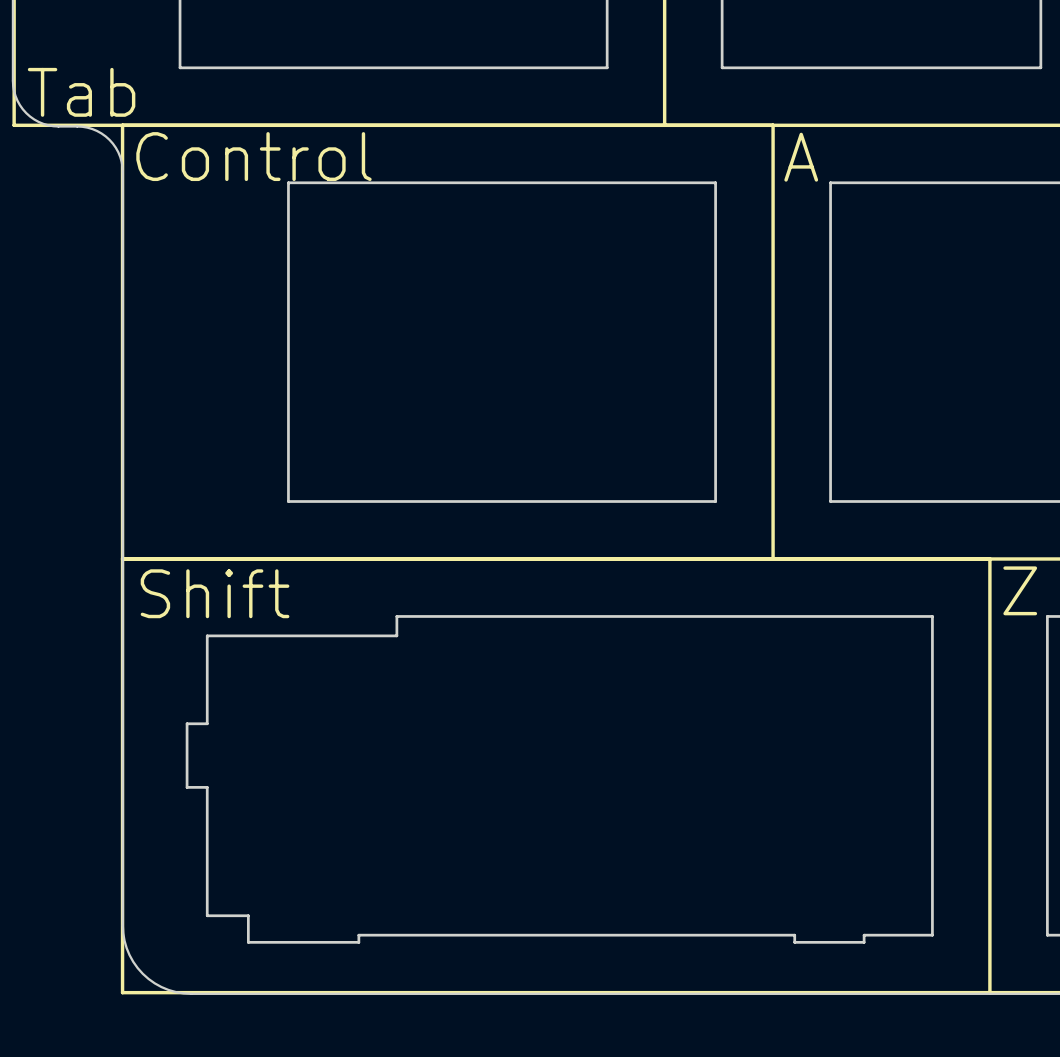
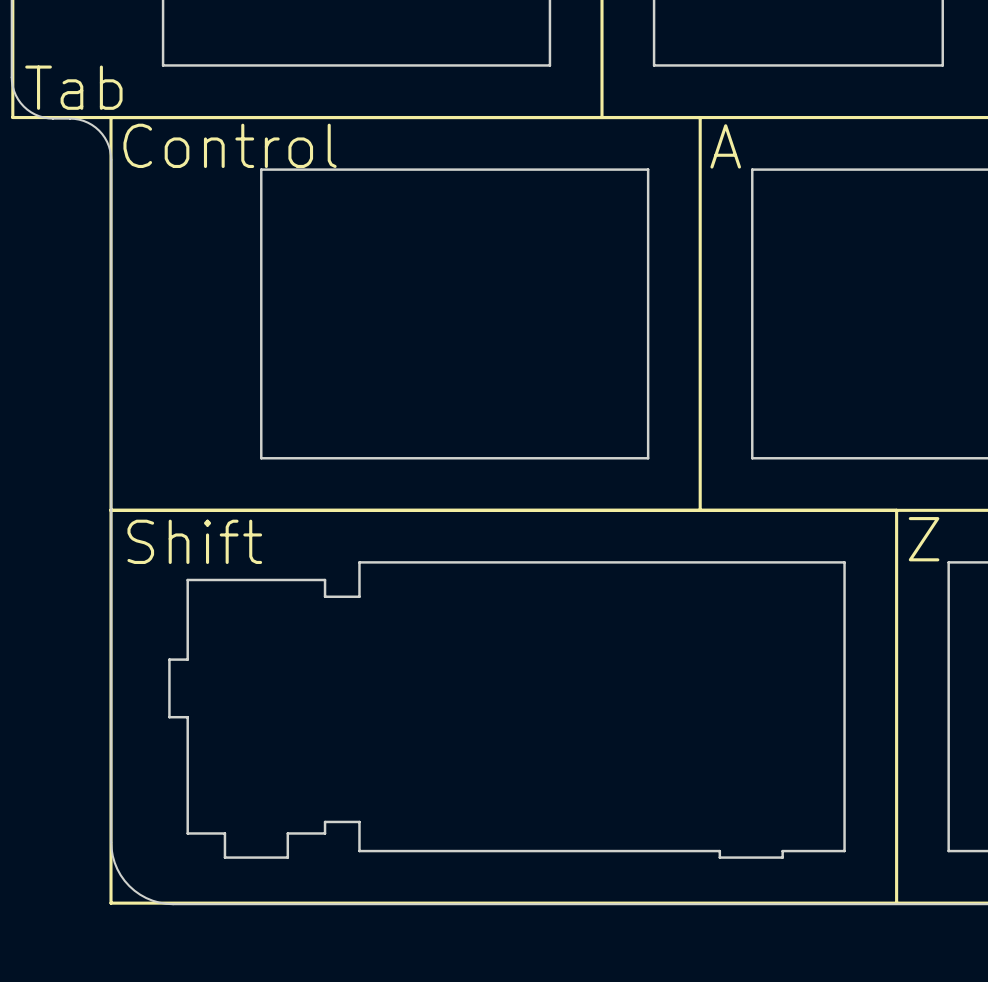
drawing shape: [120, 557, 992, 995] -> [109, 508, 899, 905]

